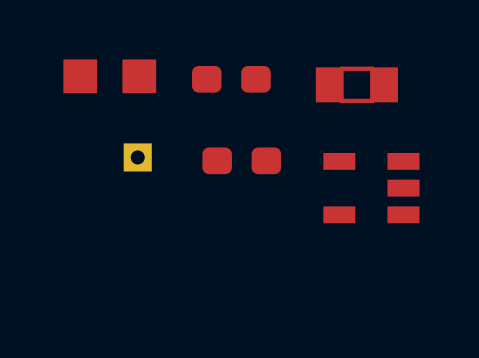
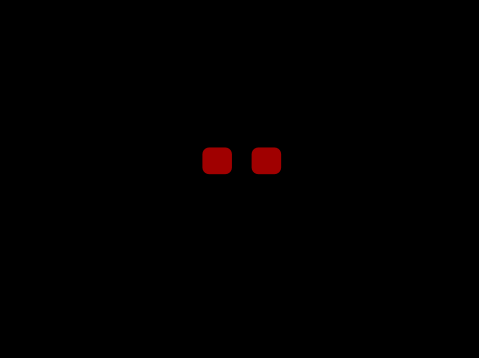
part: (109, 76) -> none
part: (231, 79) -> none
part: (356, 84) -> none
part: (137, 157) -> none
part: (371, 188) -> none

